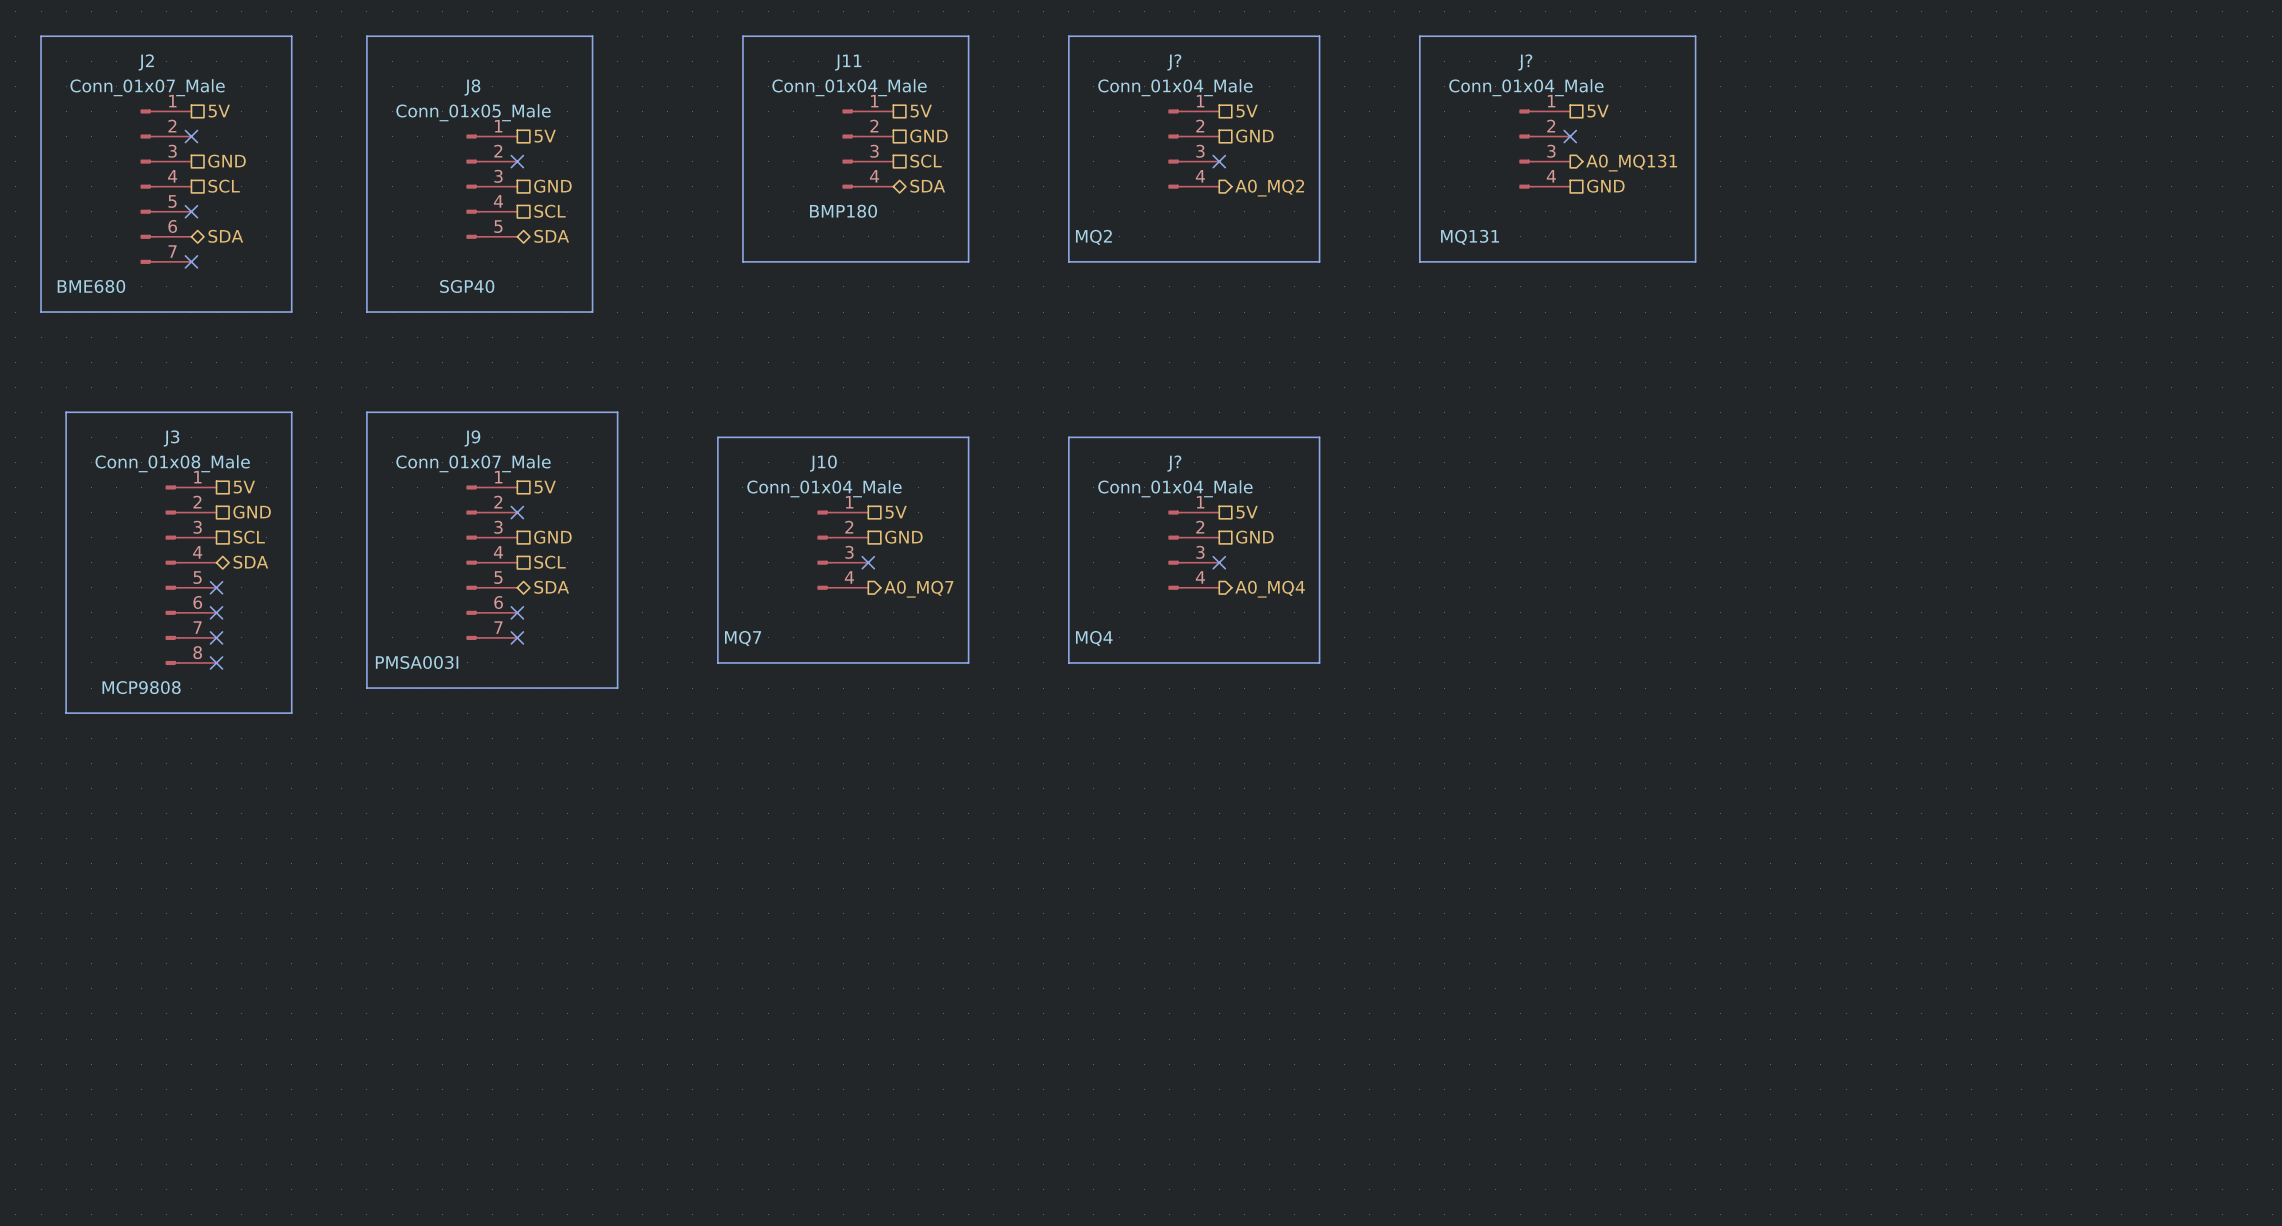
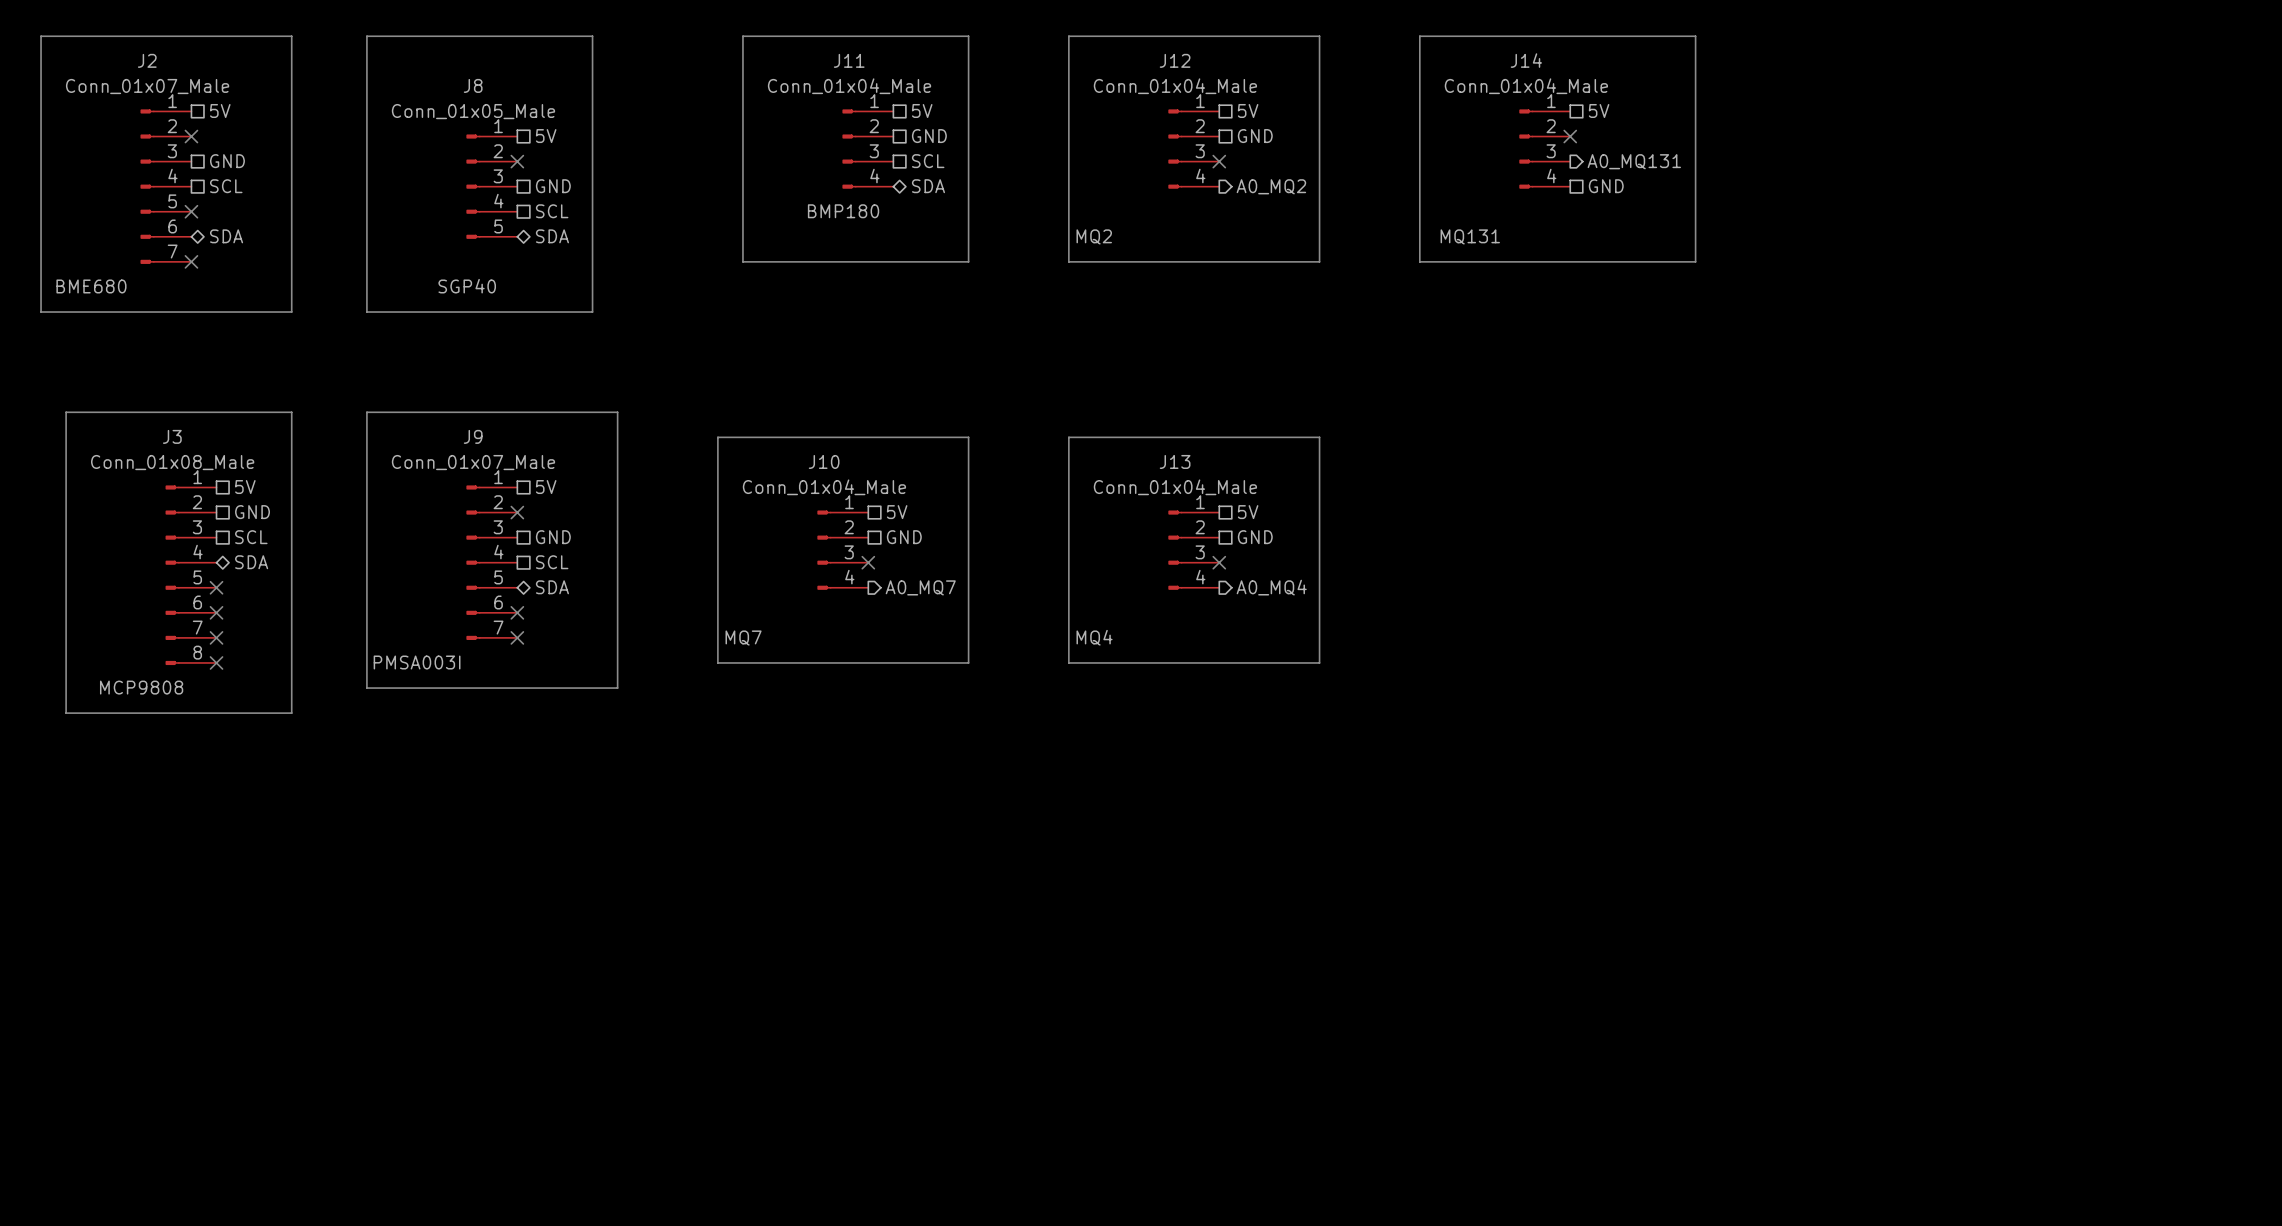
J? name: J? (1174, 62) -> J12 (1175, 60)
J? name: J? (1525, 62) -> J14 (1526, 60)
J? name: J? (1174, 463) -> J13 (1175, 461)

